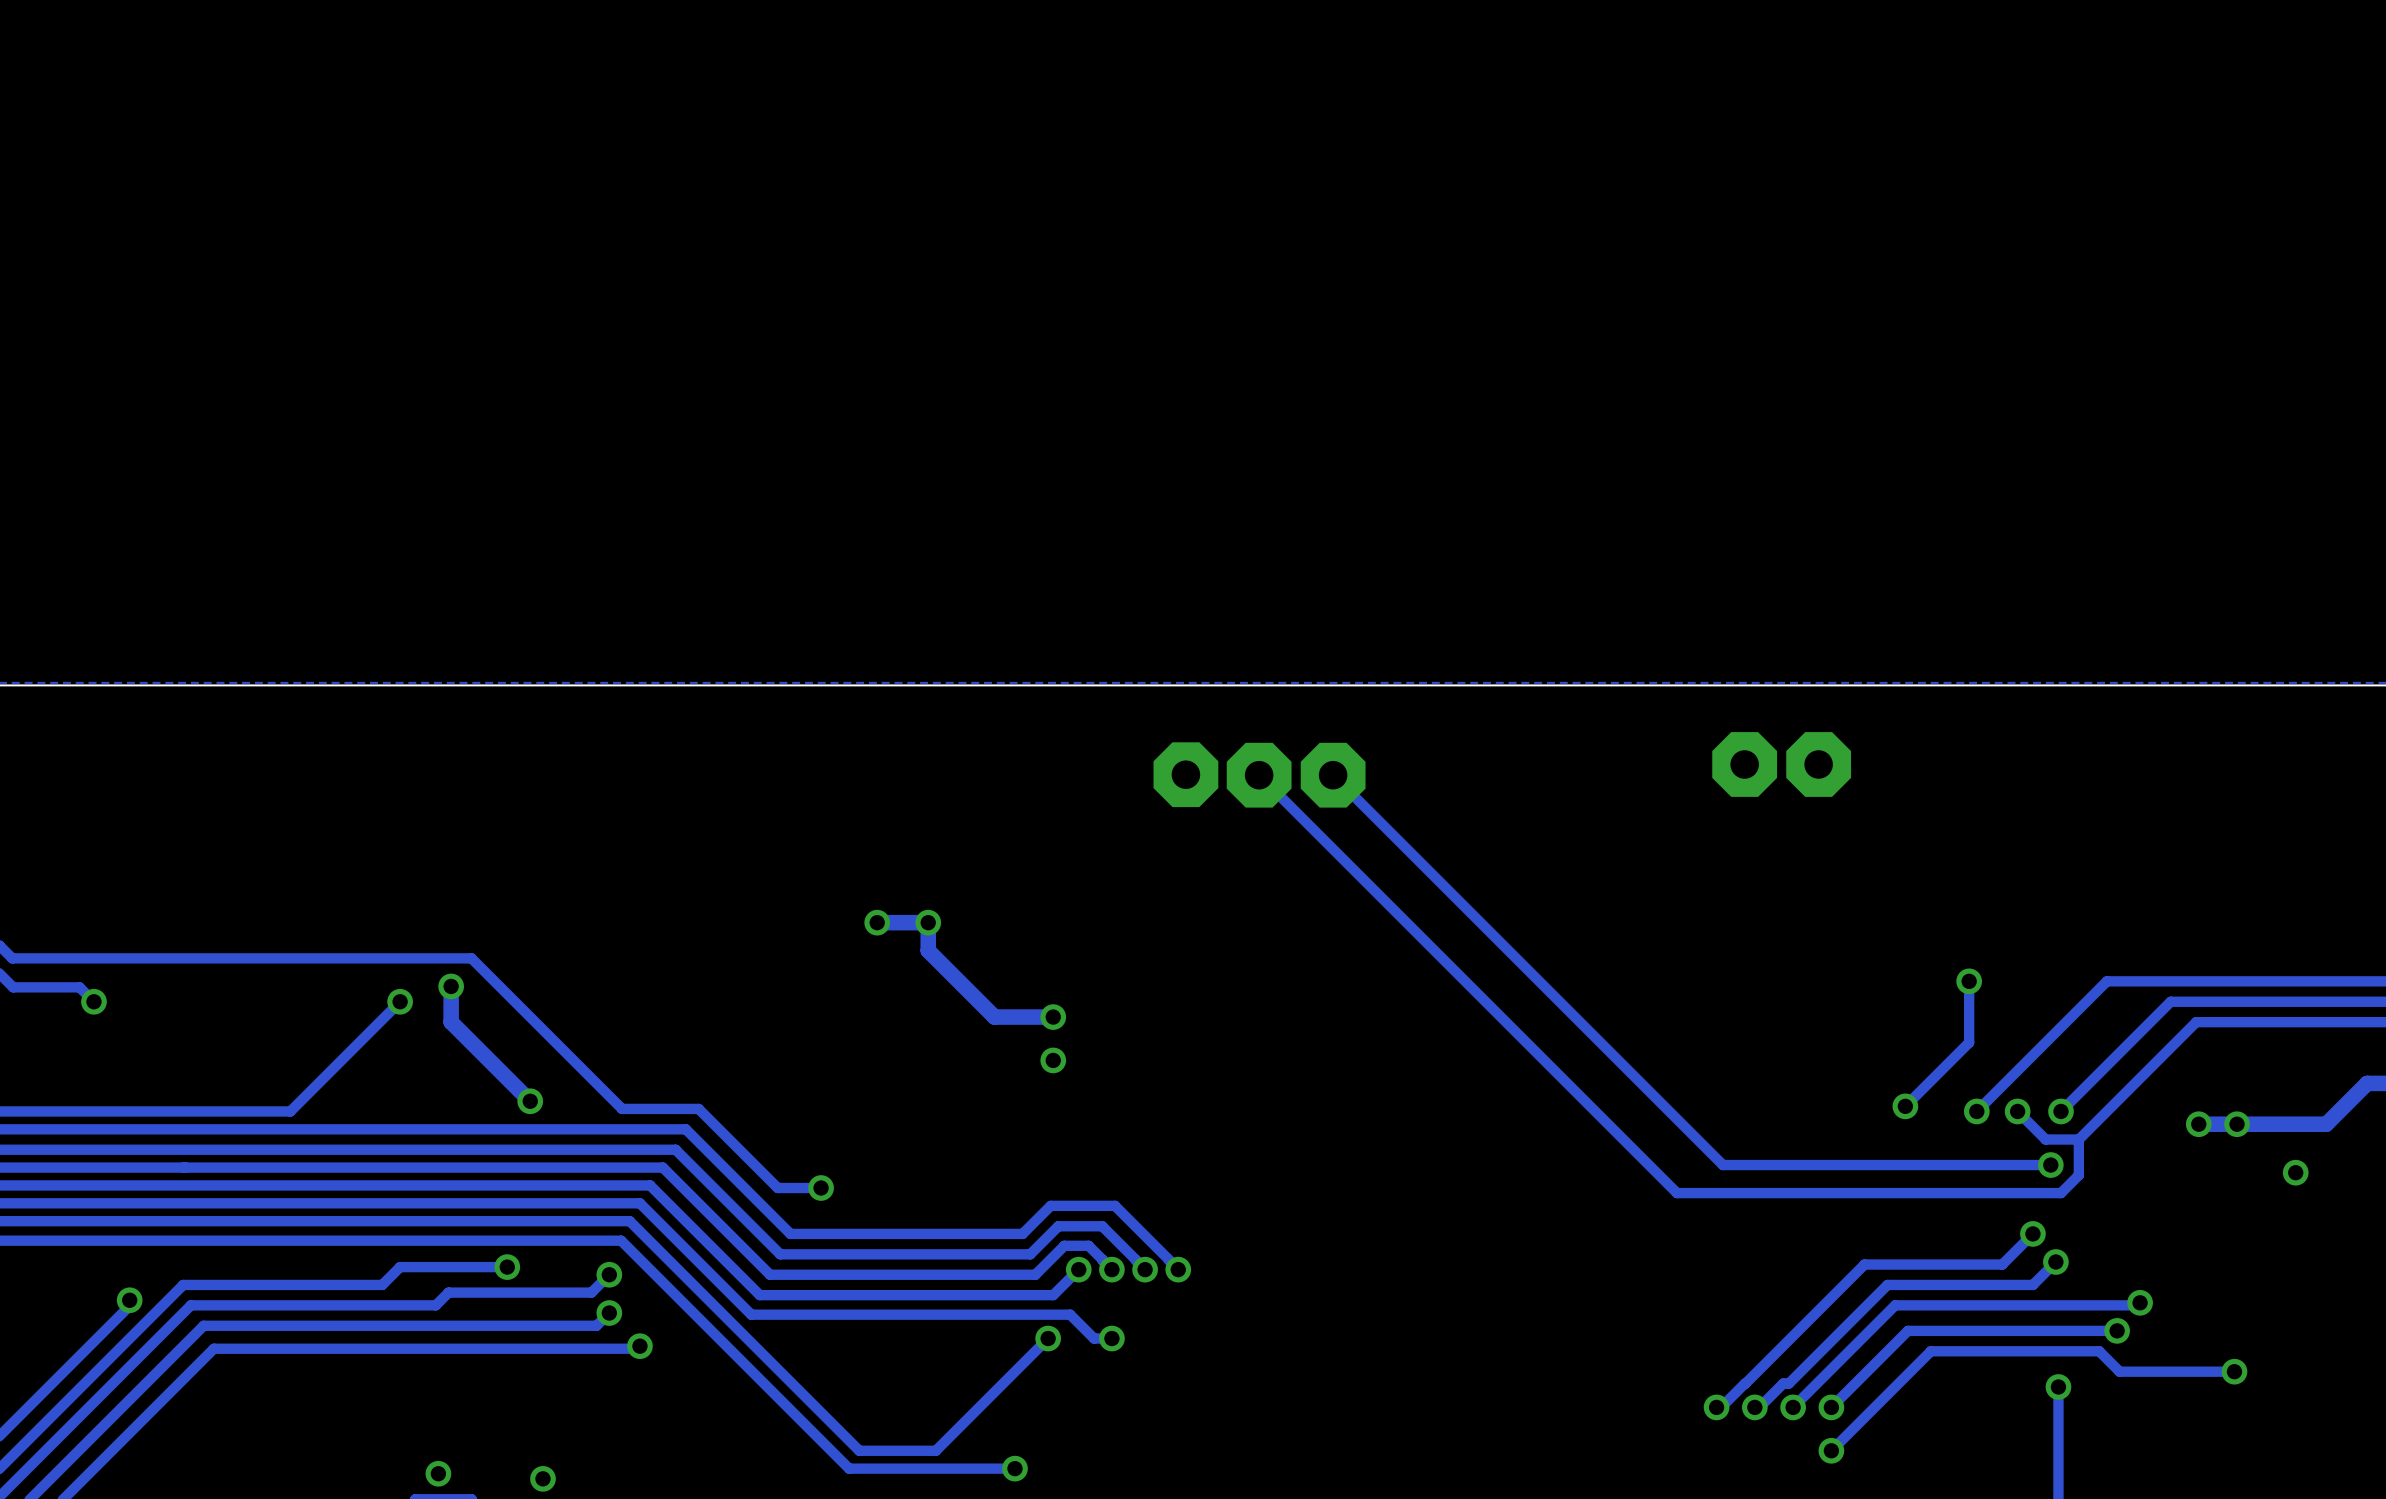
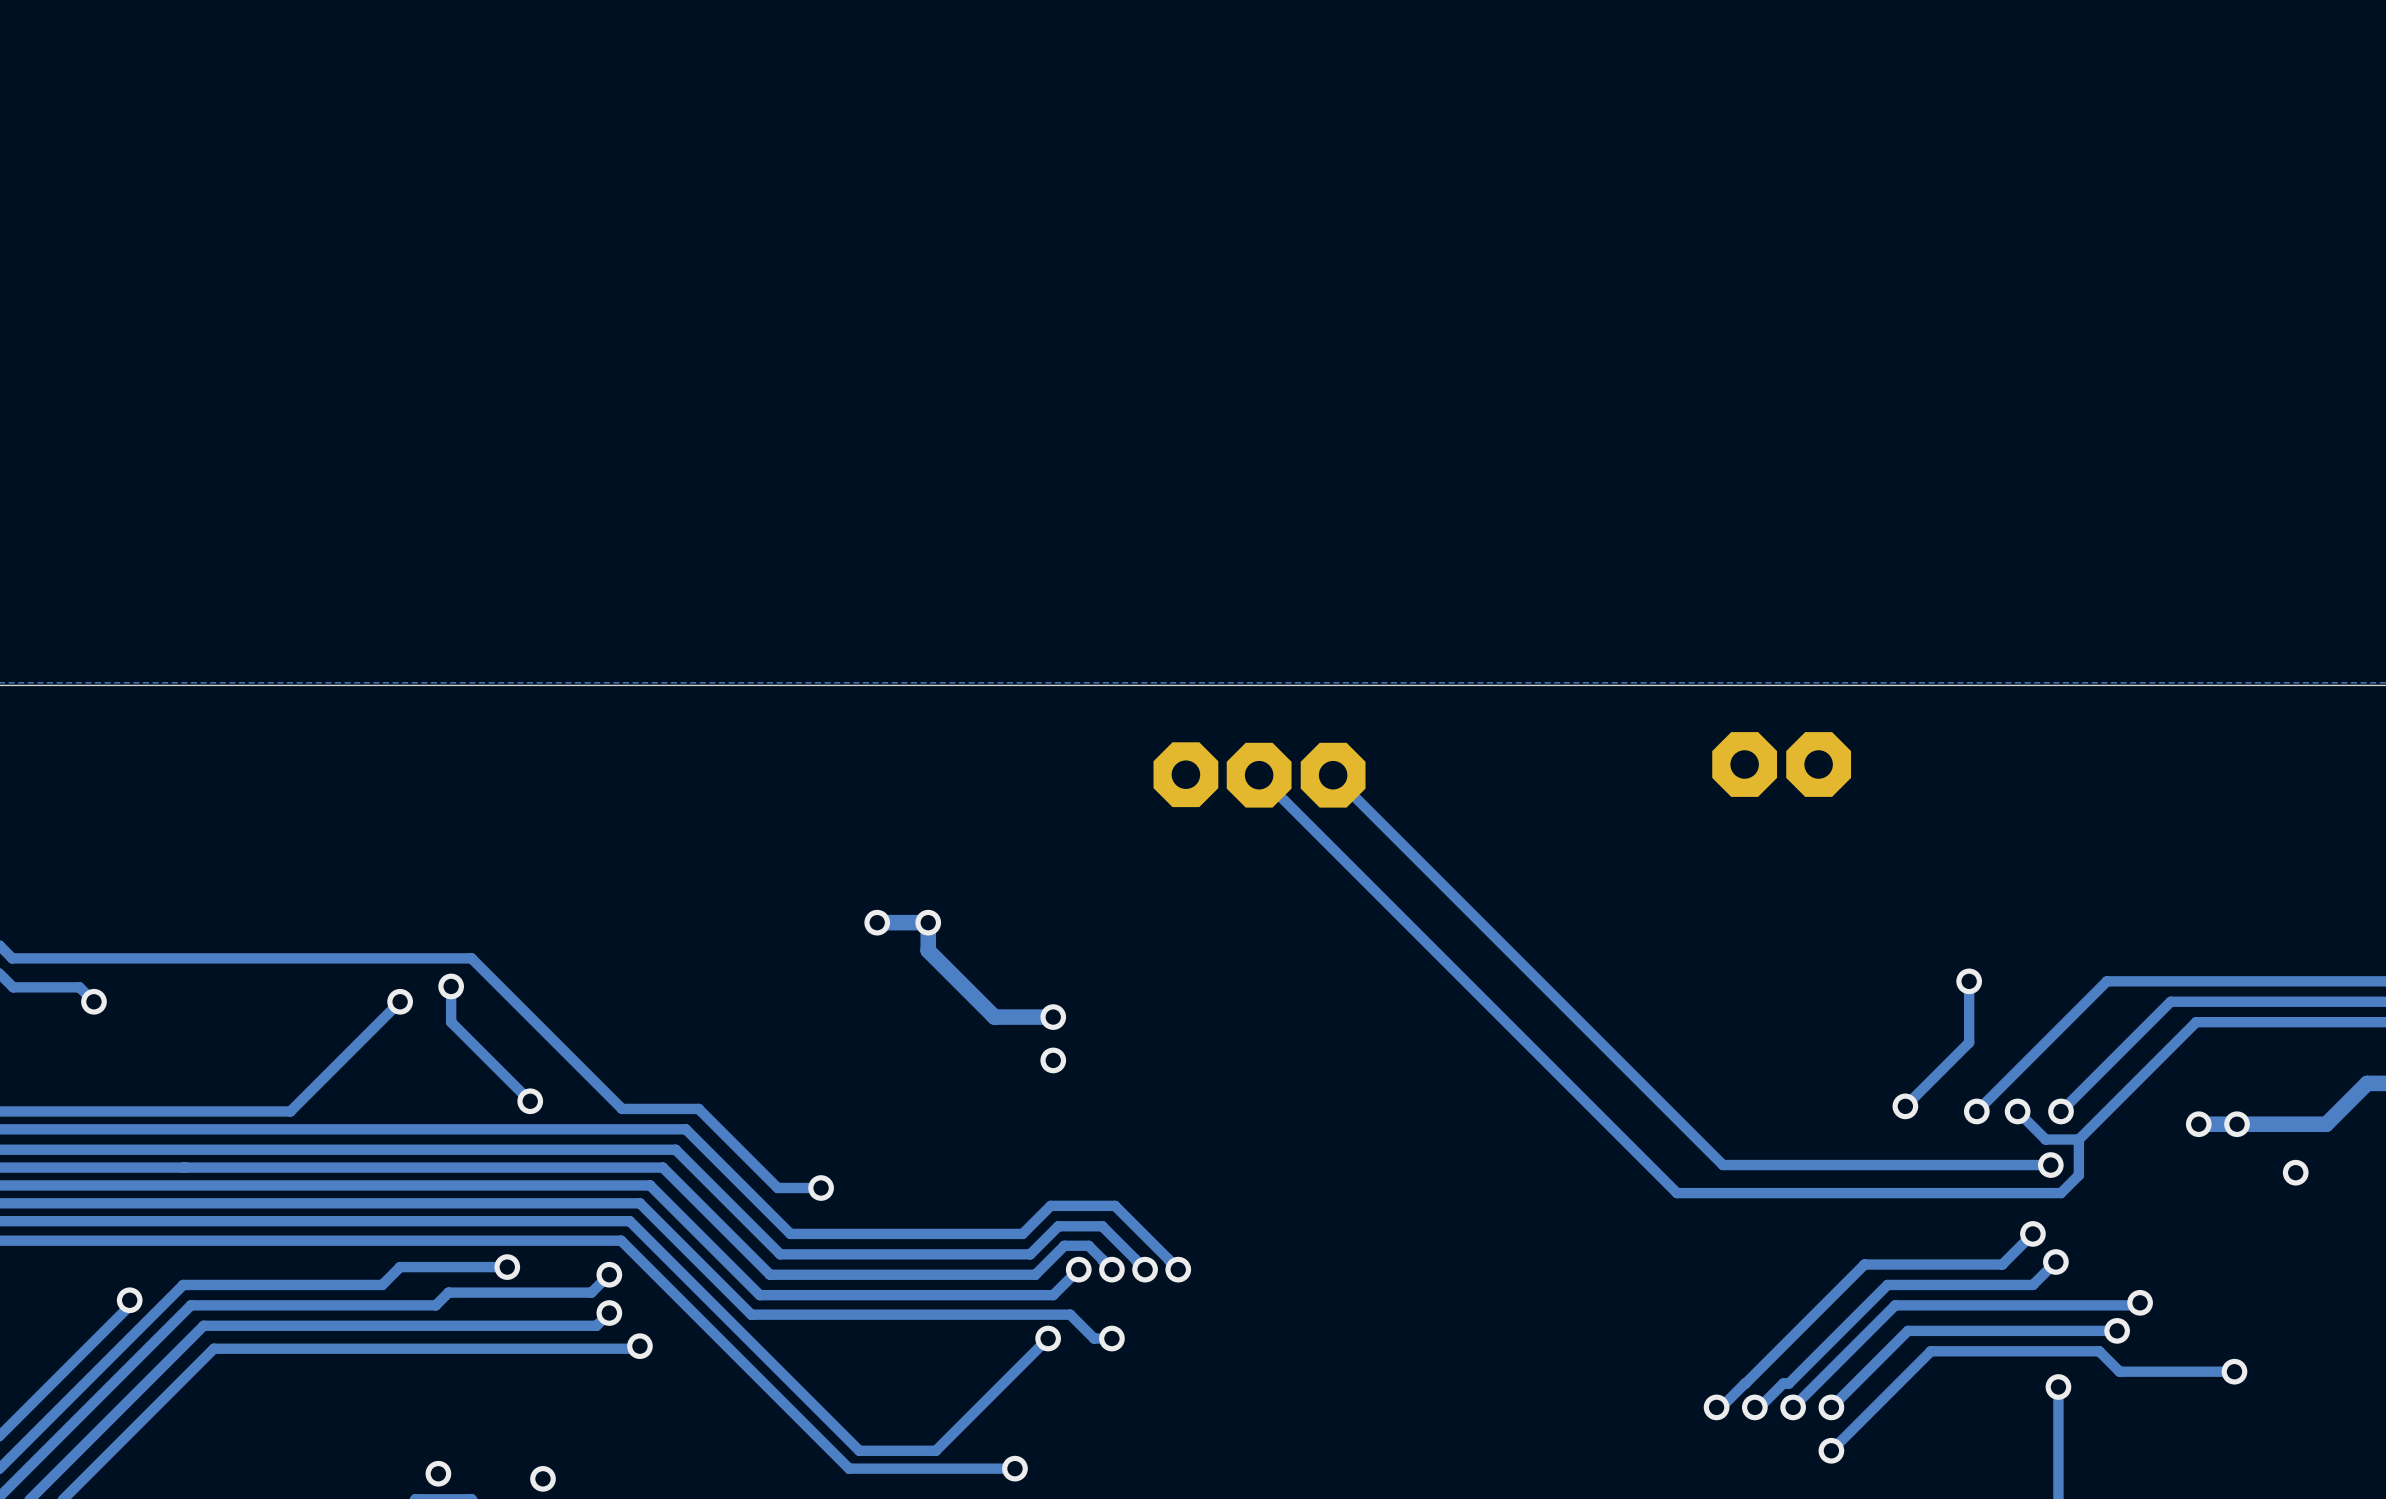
track width: thick (451, 986) (451, 1022) (530, 1101) -> thin (451, 986) (451, 1022) (530, 1101)

